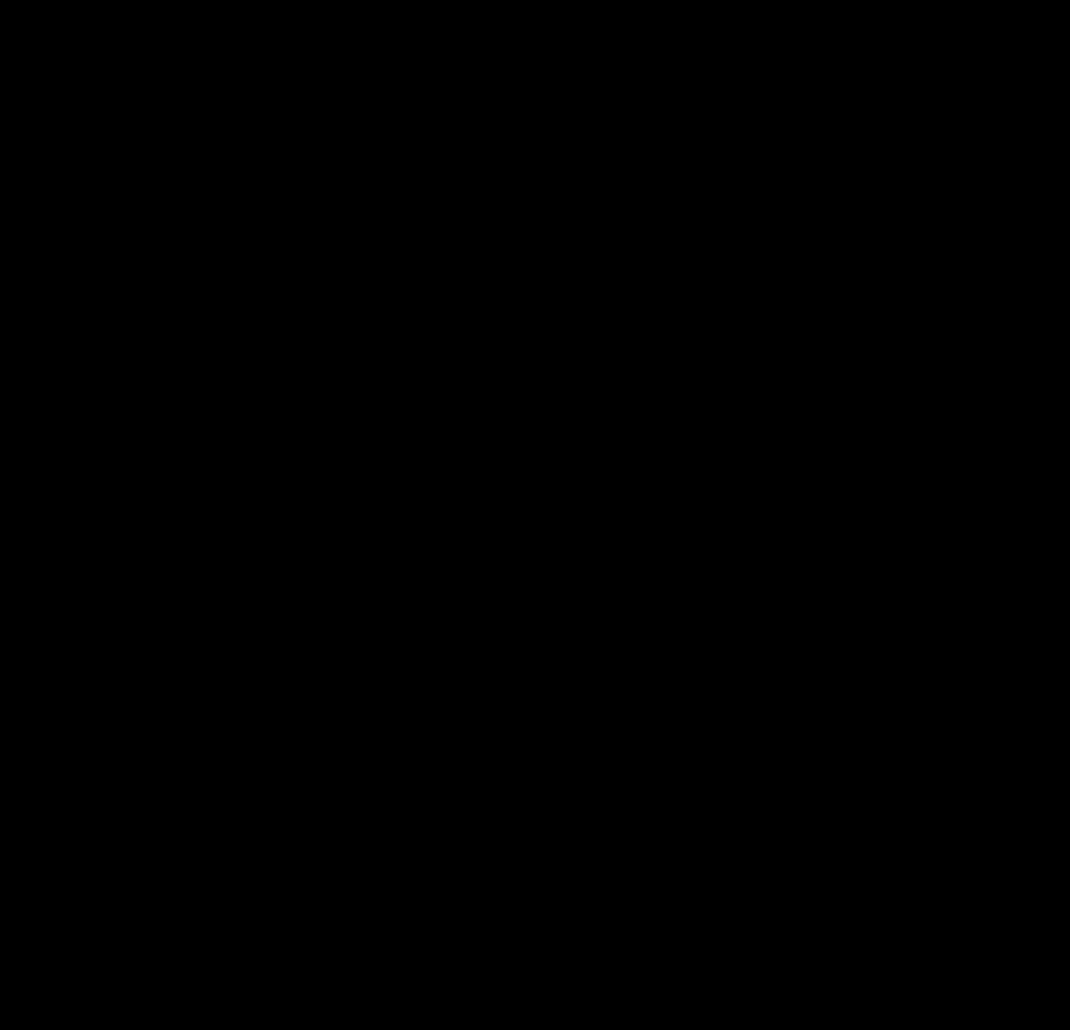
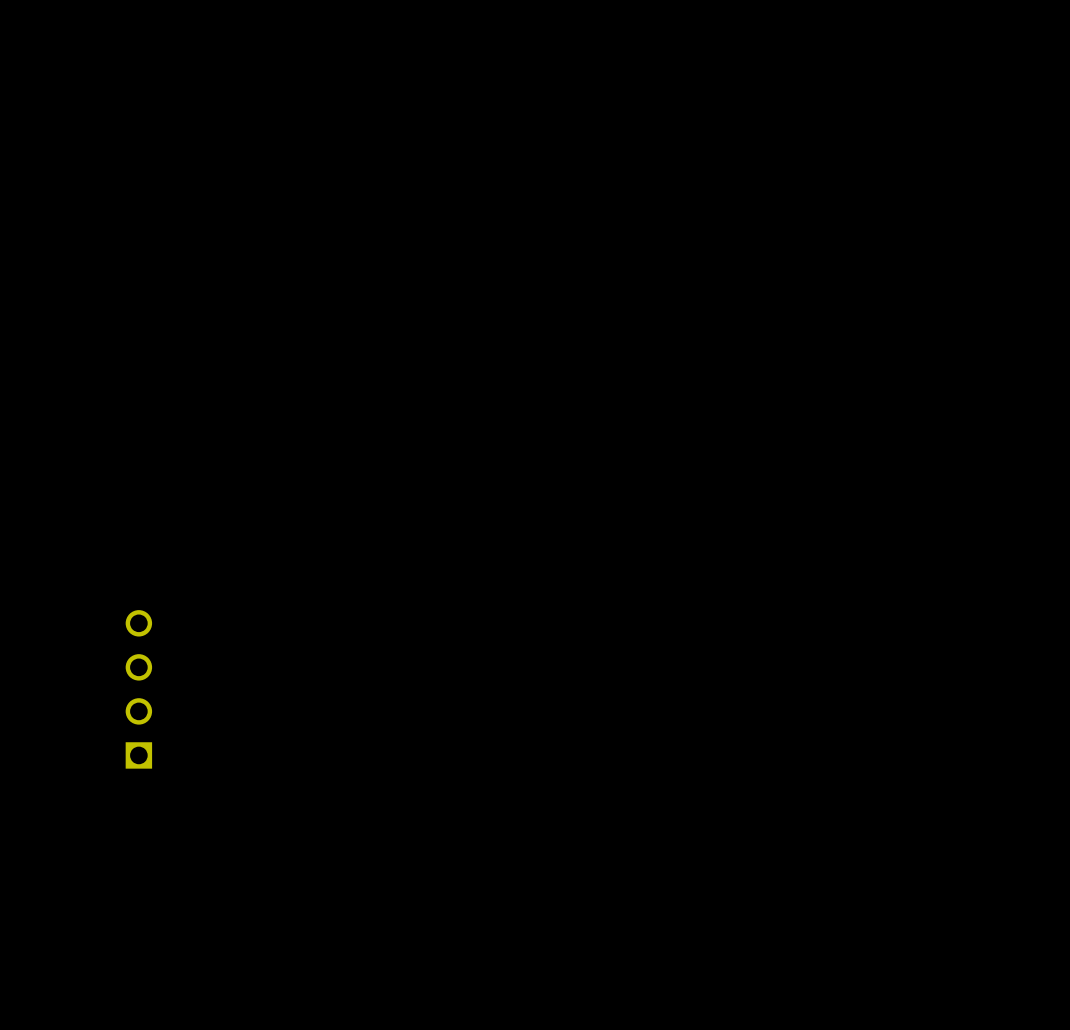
part: none -> (138, 689)

